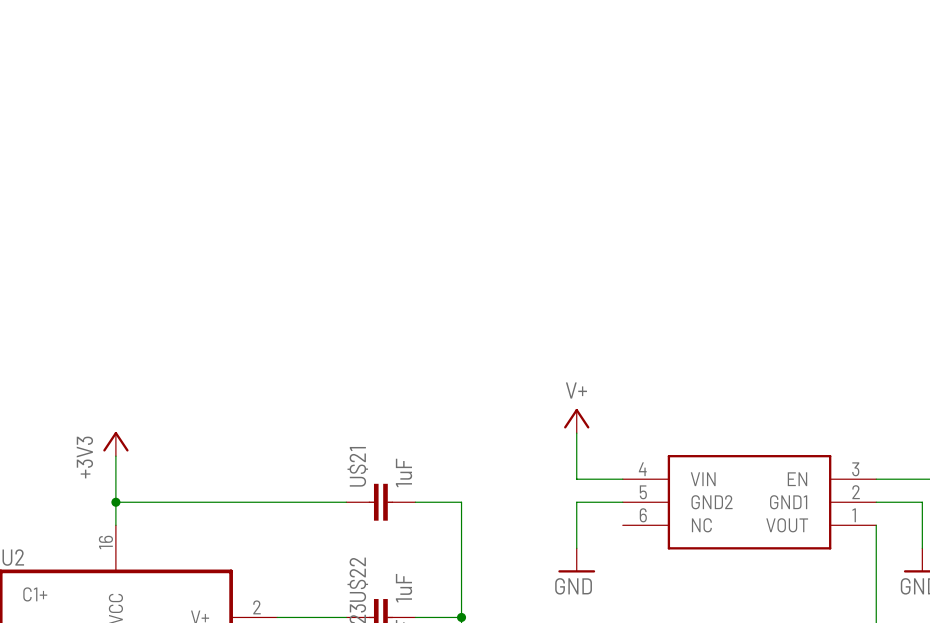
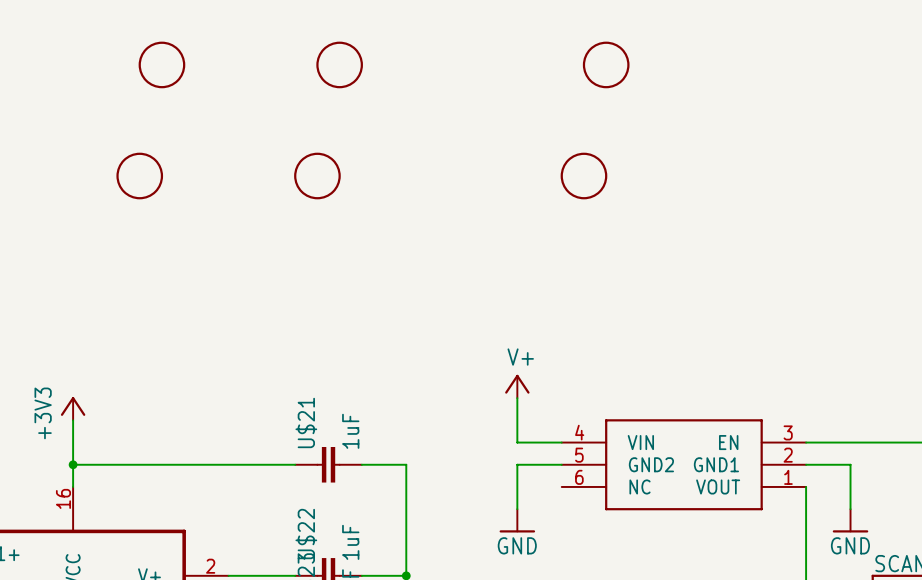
part: none -> (161, 64)
part: none -> (339, 64)
part: none -> (606, 64)
part: none -> (139, 176)
part: none -> (317, 176)
part: none -> (583, 176)

